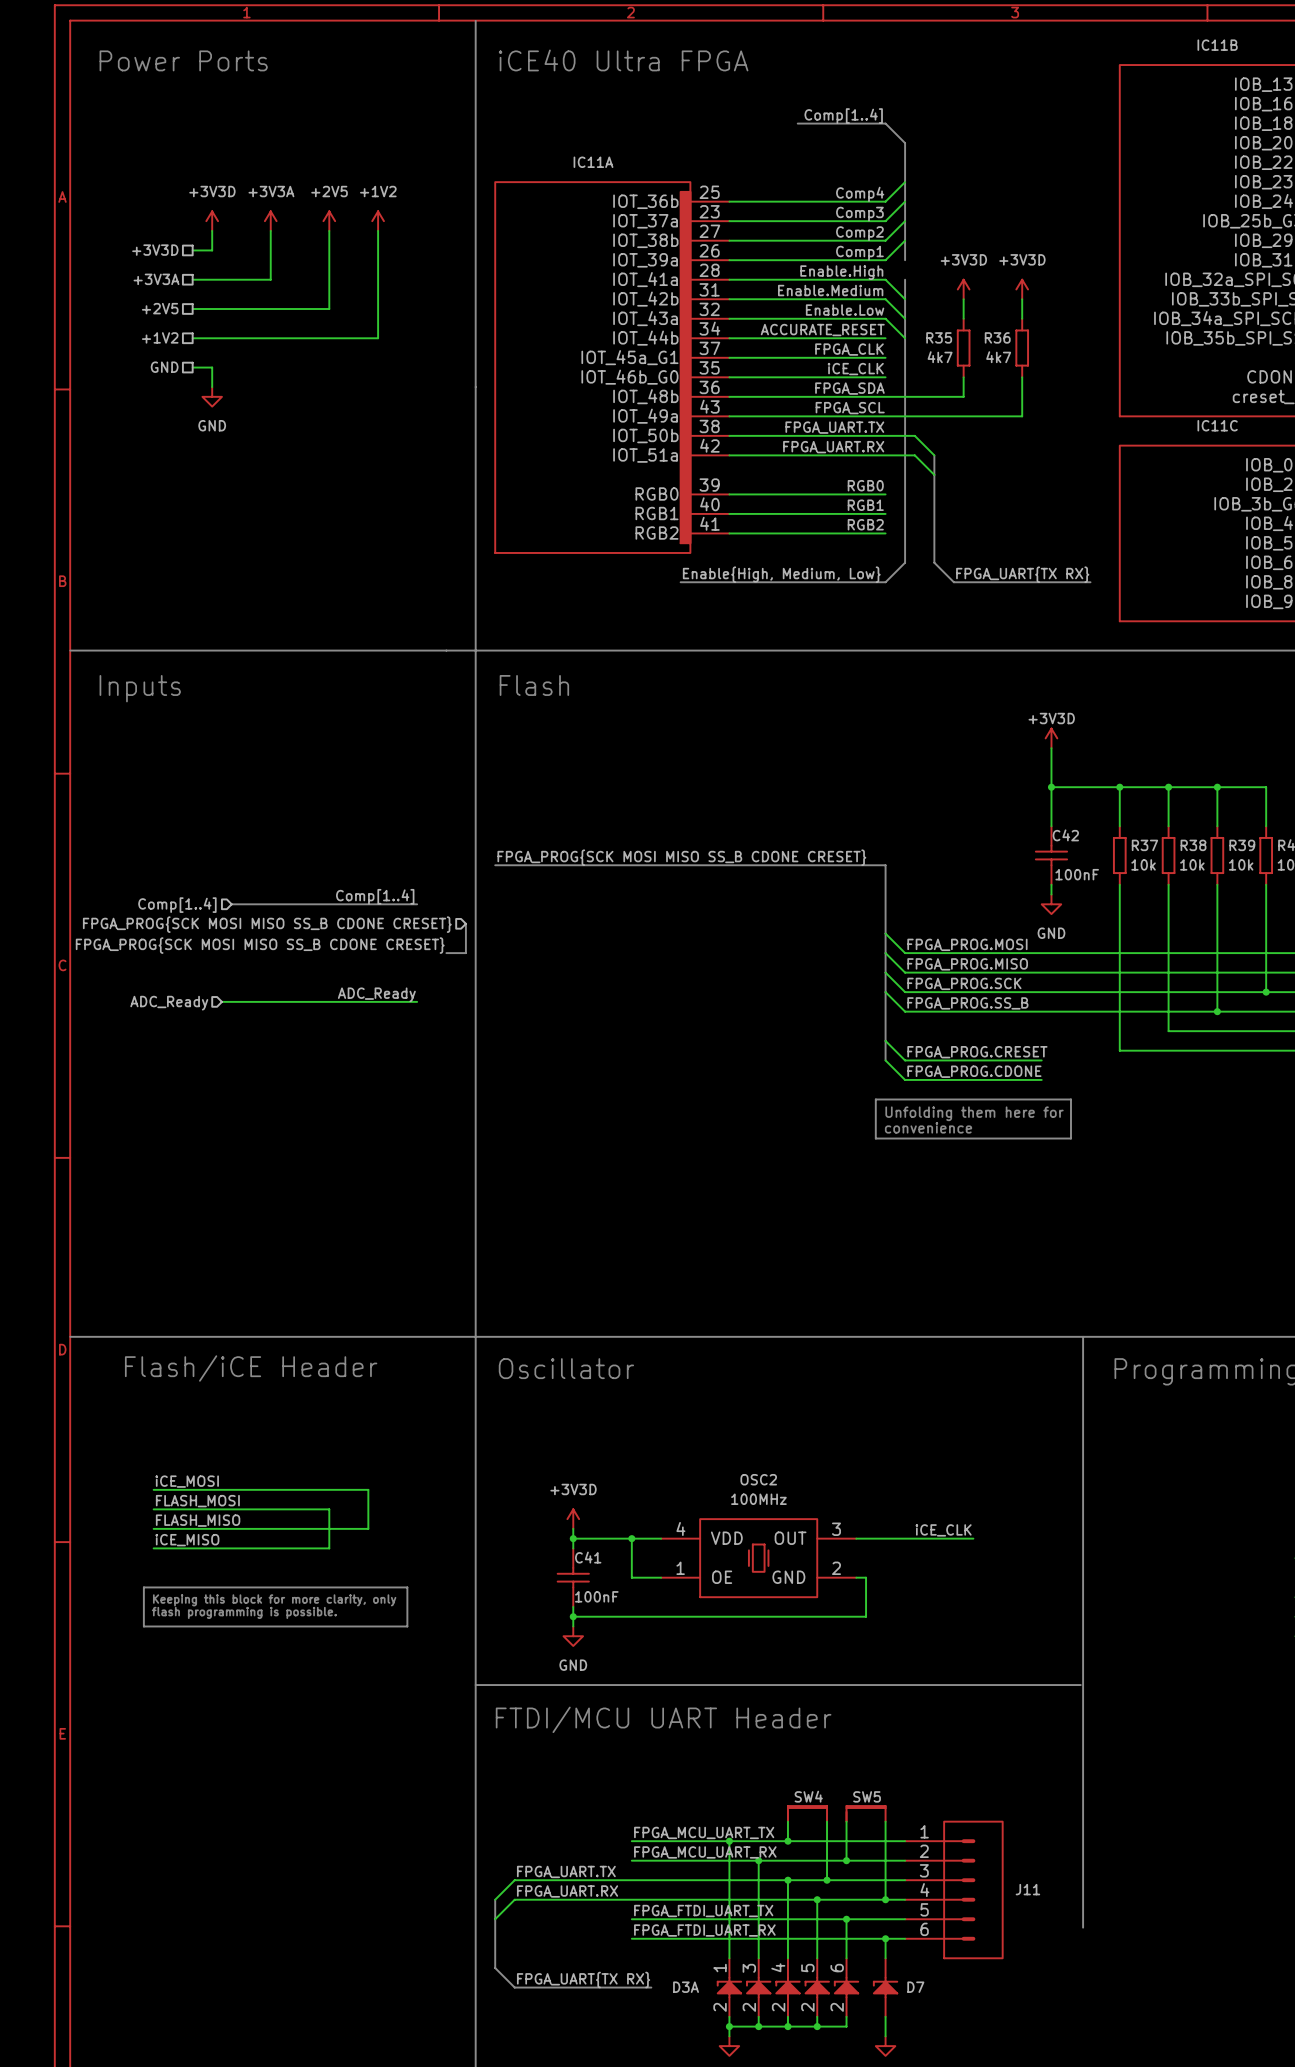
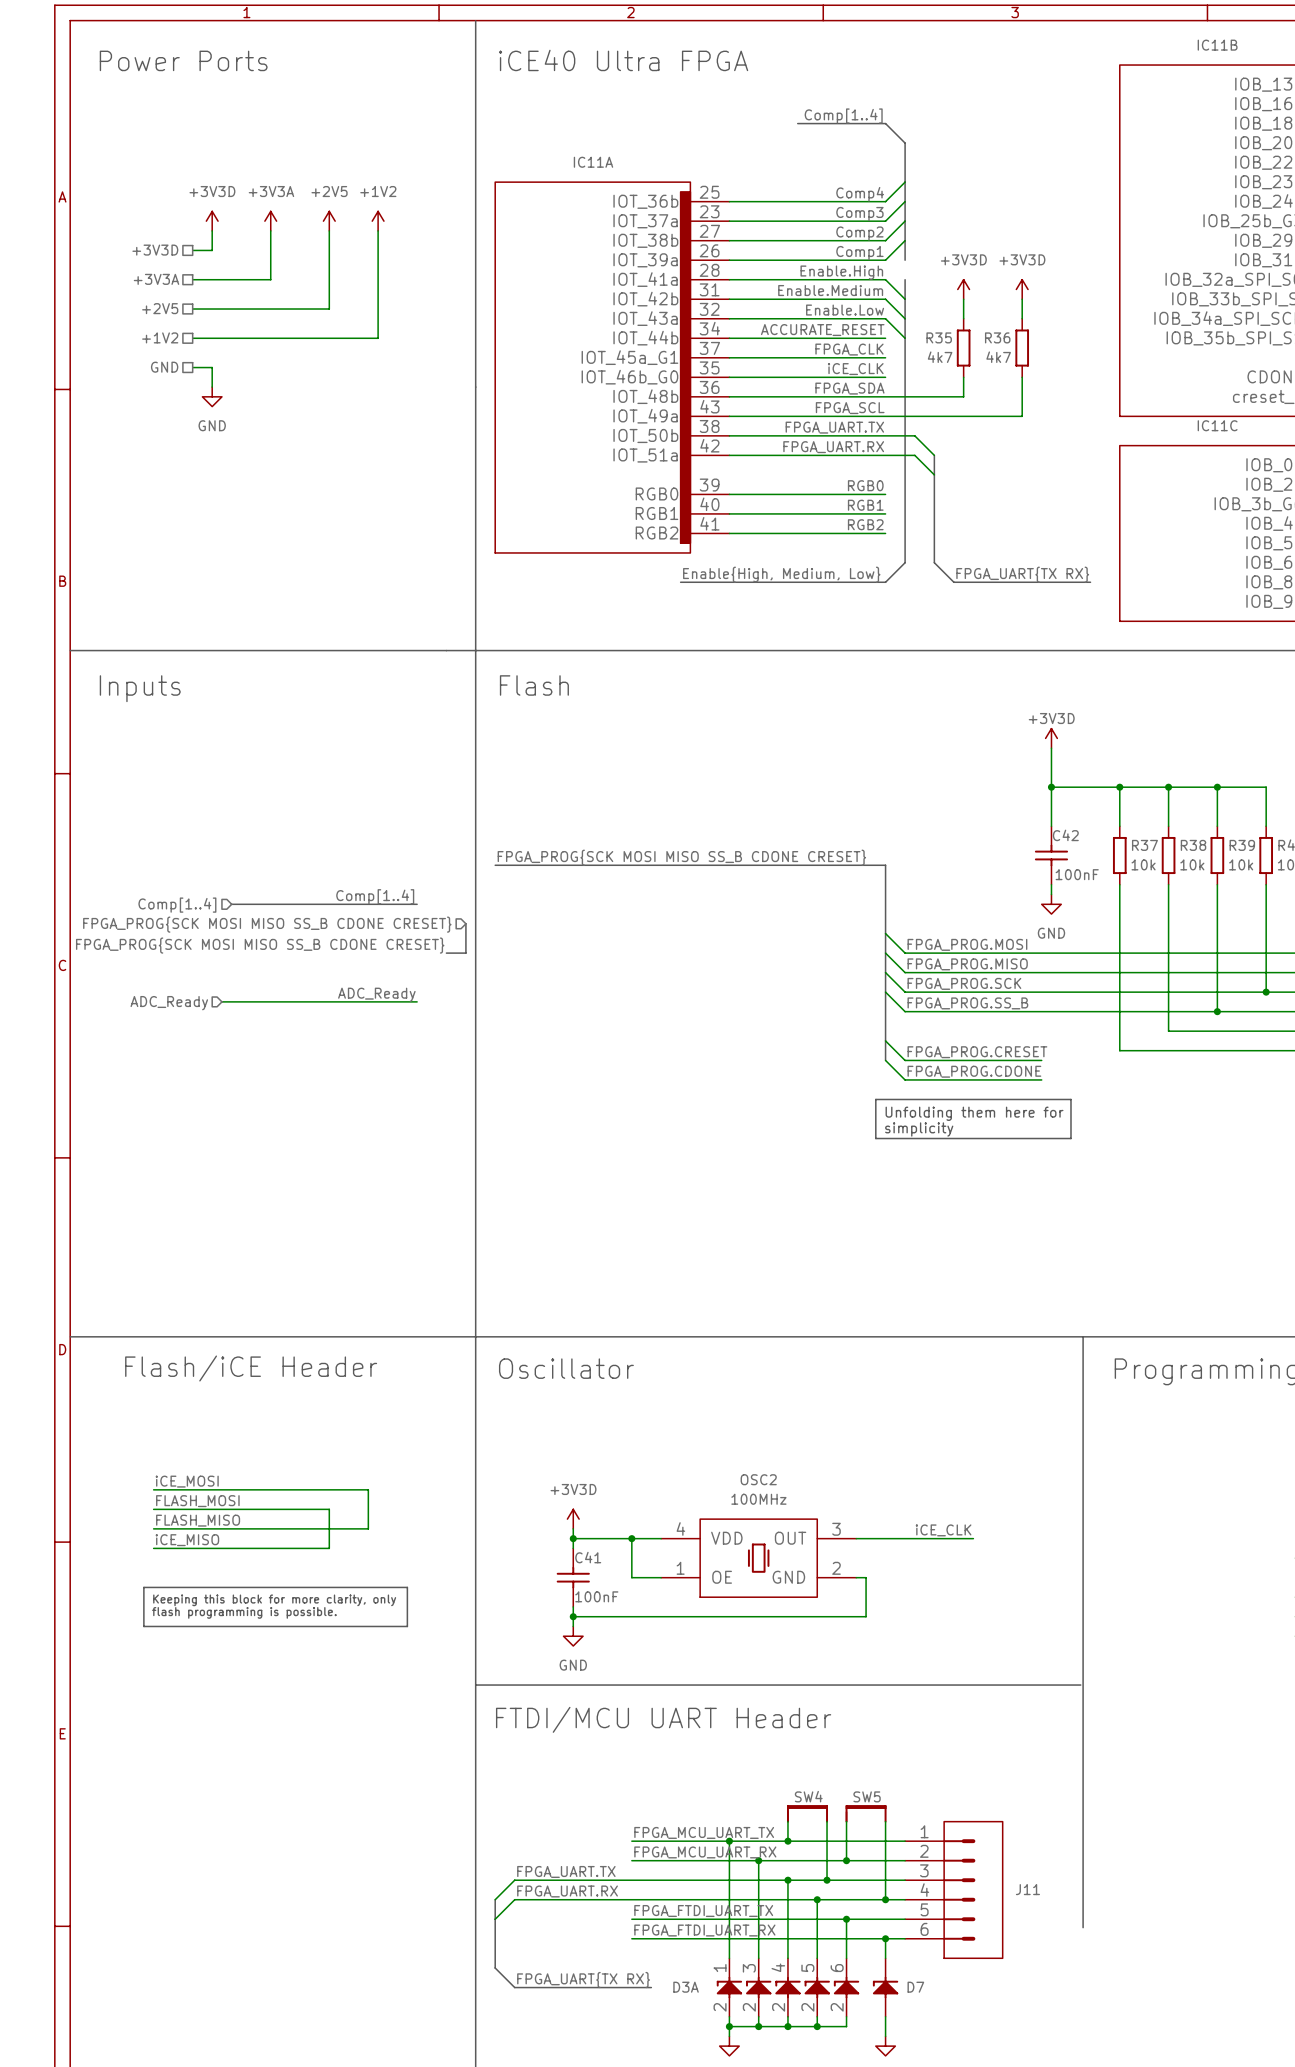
text: convenience (928, 1127) -> simplicity (919, 1129)

